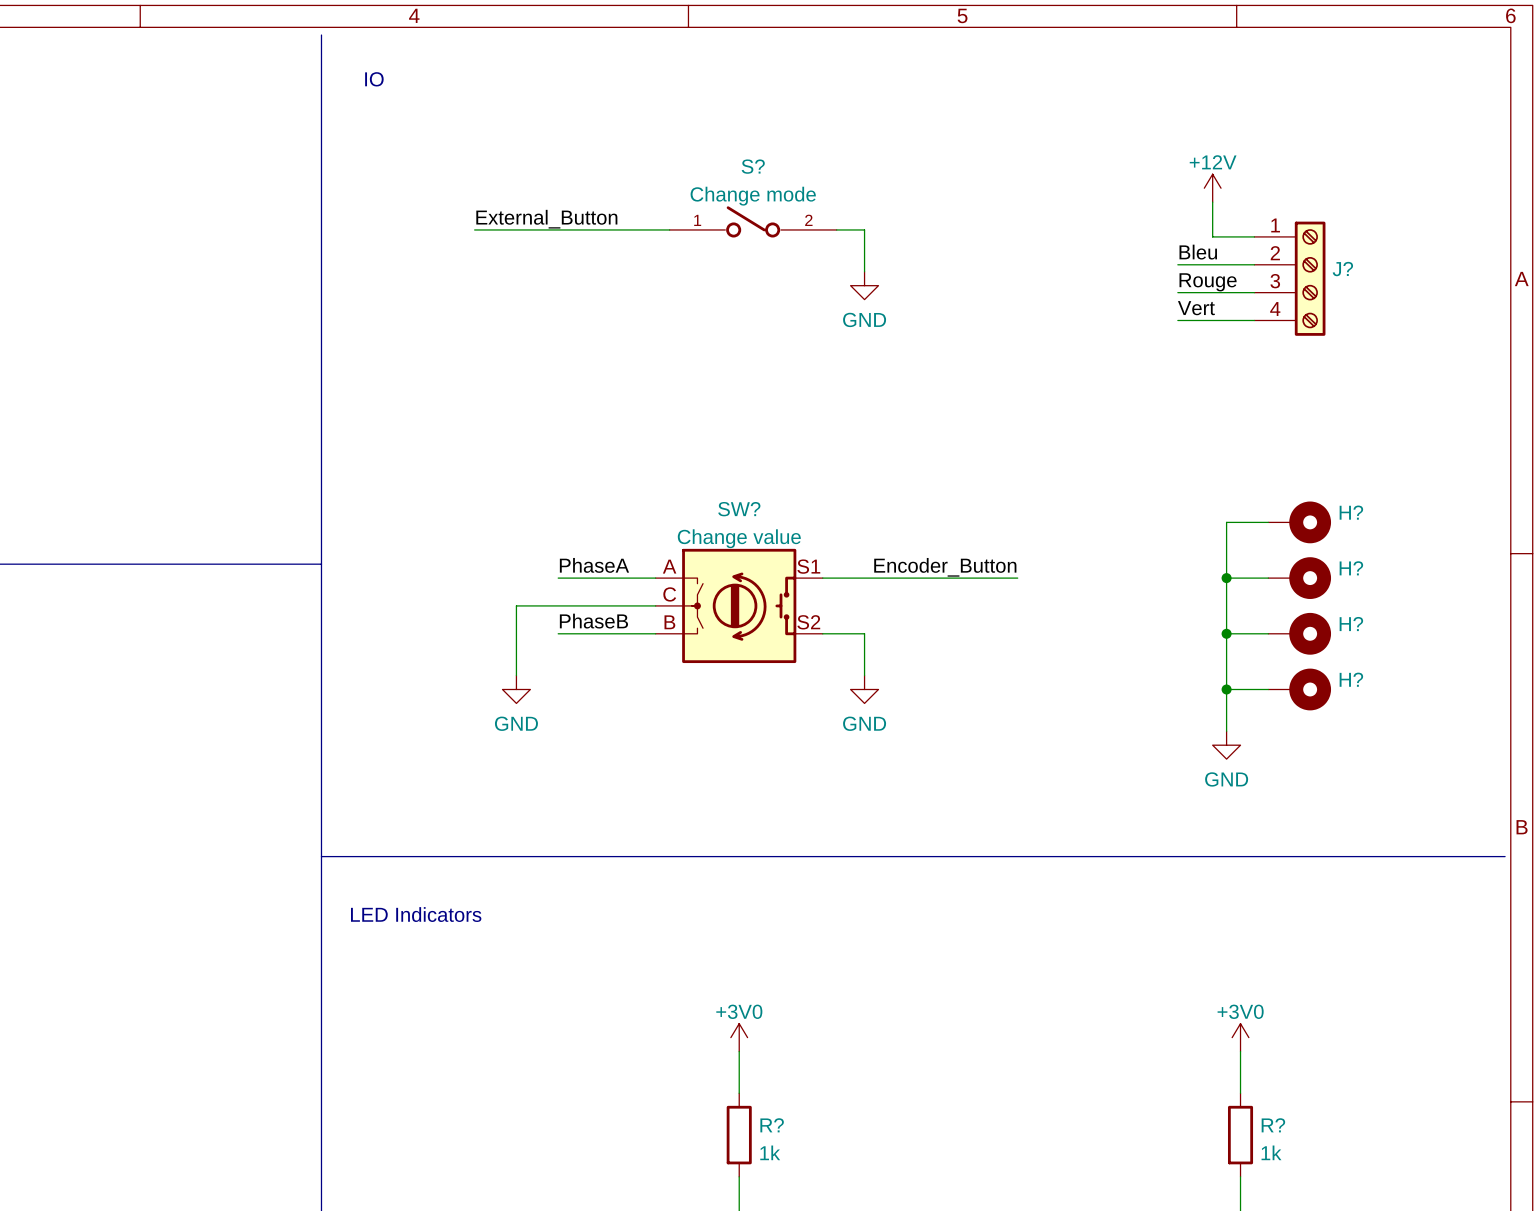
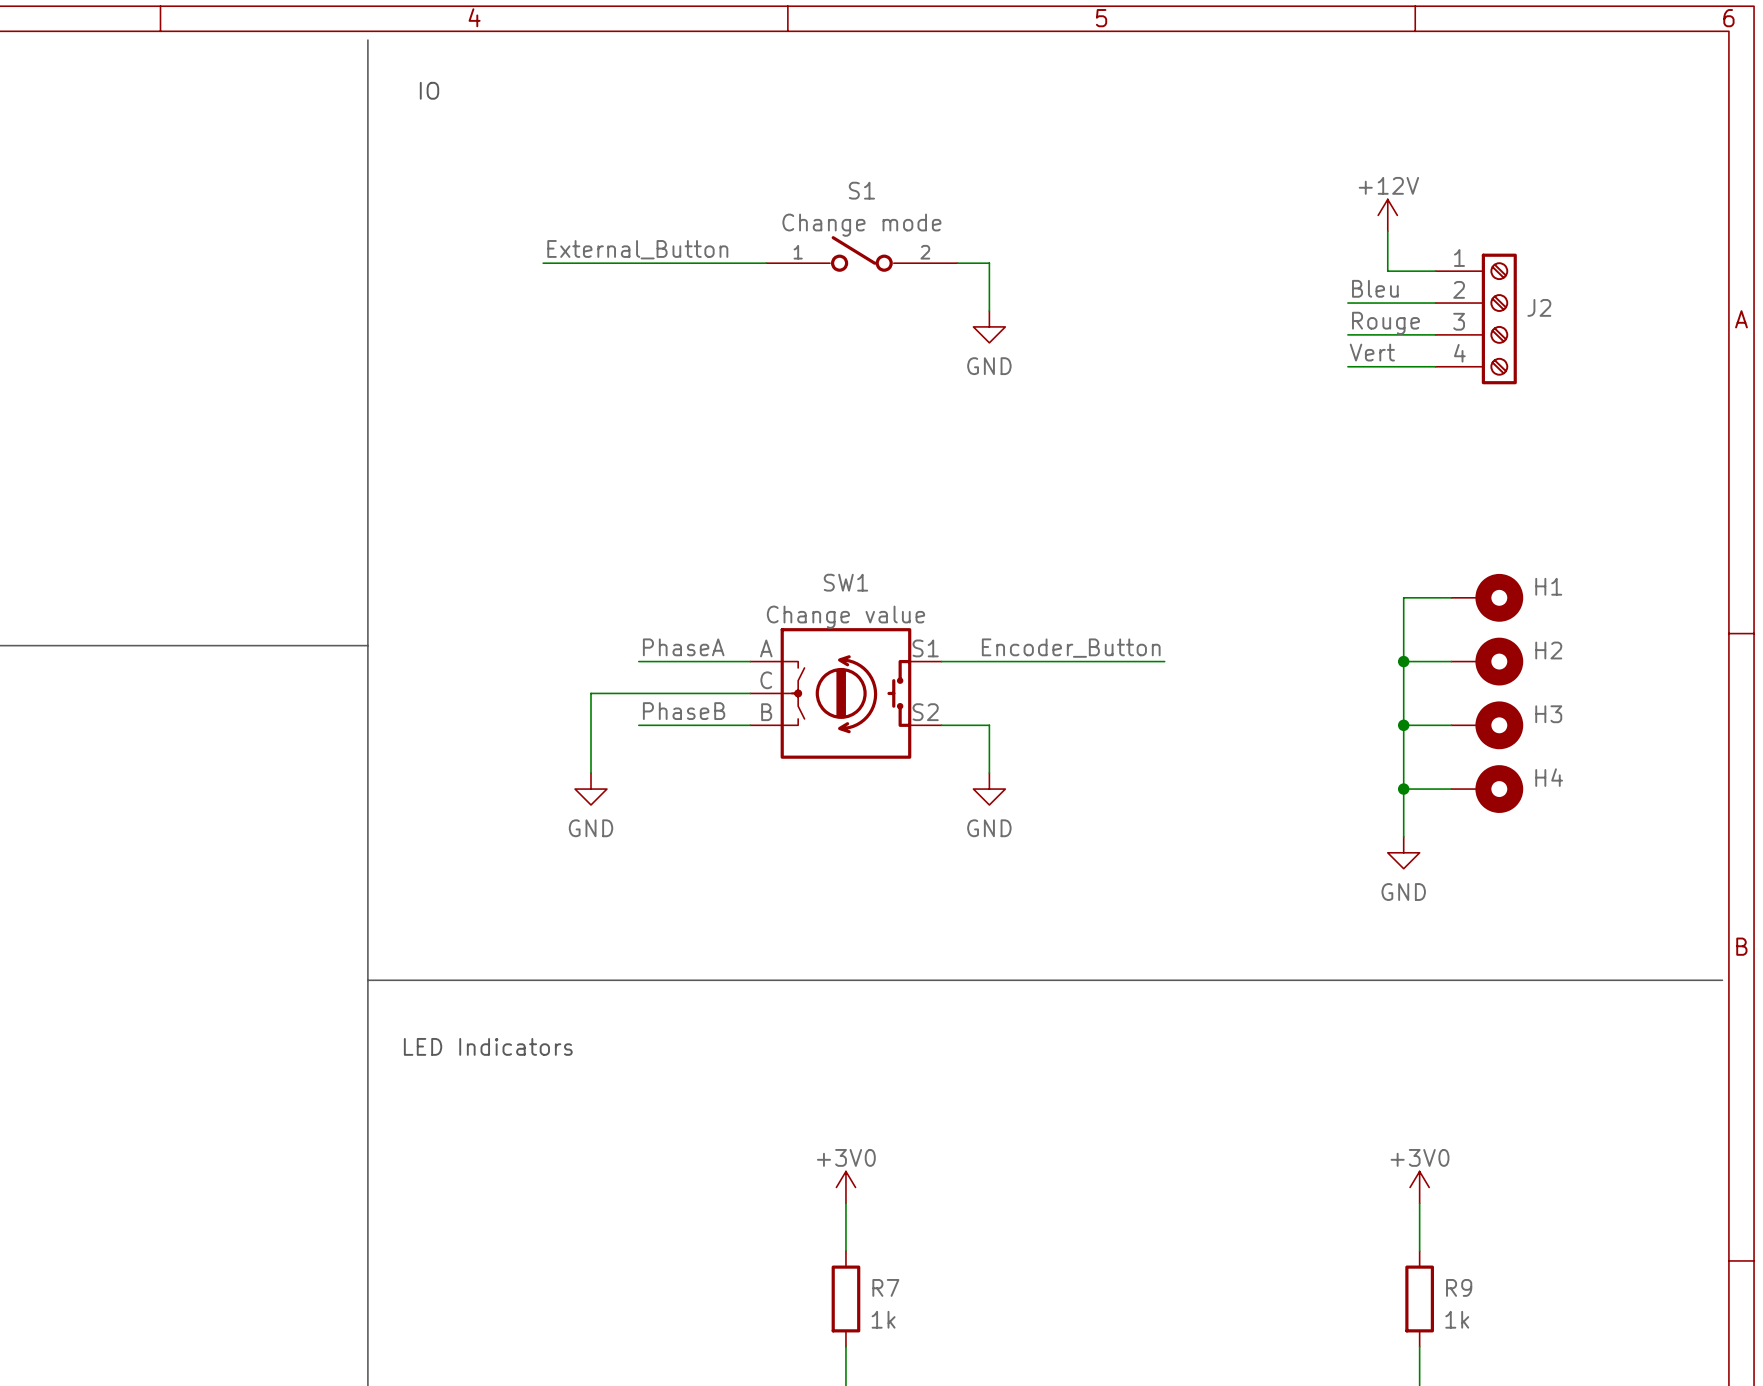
S? name: S? (753, 166) -> S1 (861, 190)
J? name: J? (1342, 269) -> J2 (1539, 307)
SW? name: SW? (739, 509) -> SW1 (845, 582)
H? name: H? (1351, 512) -> H1 (1548, 586)
H? name: H? (1351, 568) -> H2 (1548, 650)
H? name: H? (1351, 624) -> H3 (1548, 714)
H? name: H? (1351, 679) -> H4 (1549, 777)
R? name: R? (772, 1125) -> R7 (885, 1287)
R? name: R? (1273, 1125) -> R9 (1459, 1287)

